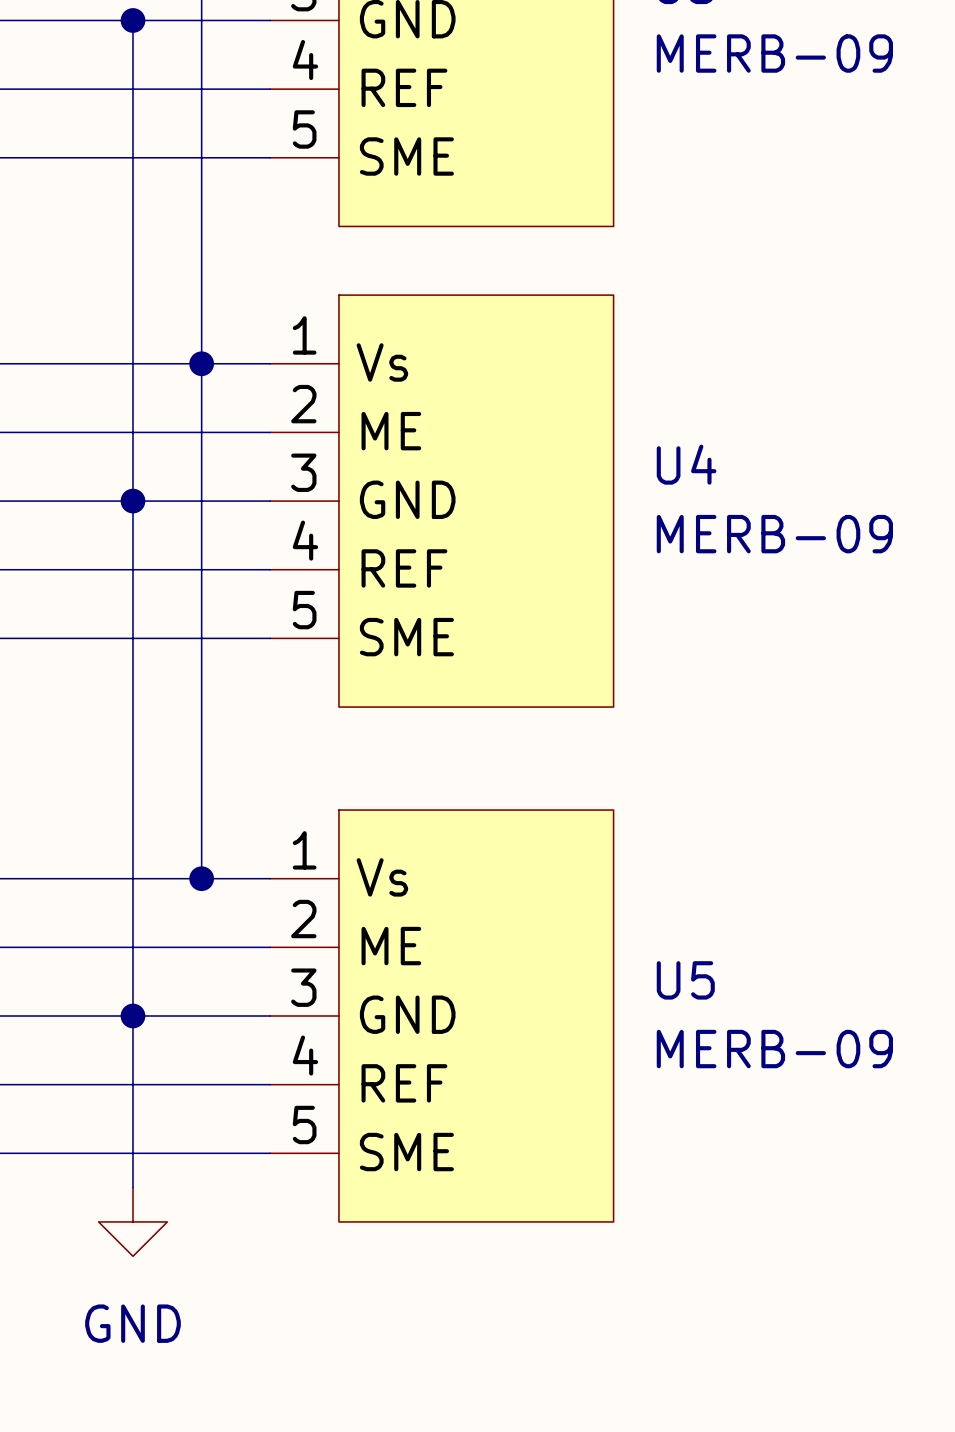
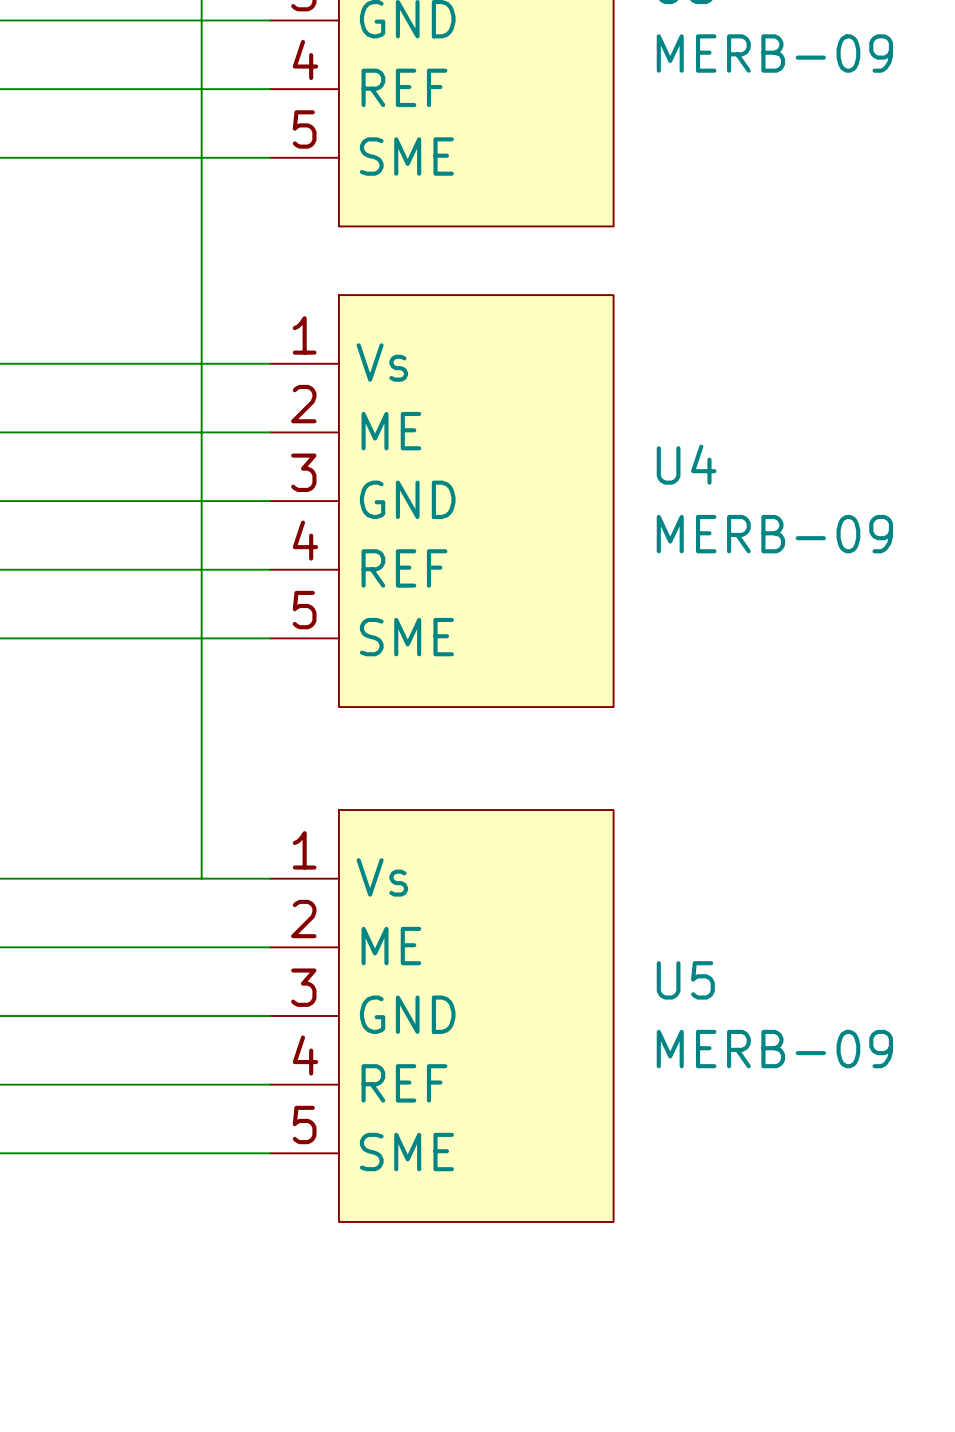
wire: (132, 20) (132, 1187) -> none
junction: (132, 20) -> none
junction: (201, 363) -> none
junction: (132, 501) -> none
junction: (201, 878) -> none
junction: (132, 1016) -> none
power symbol: GND (132, 1221) -> none

